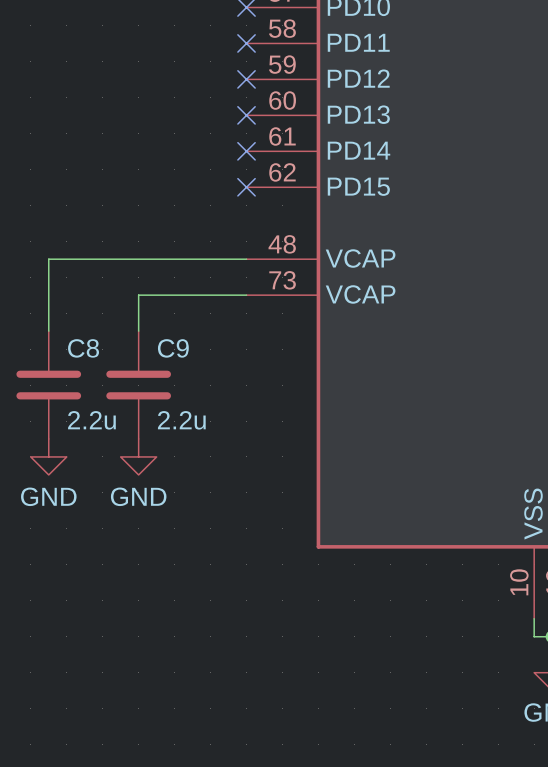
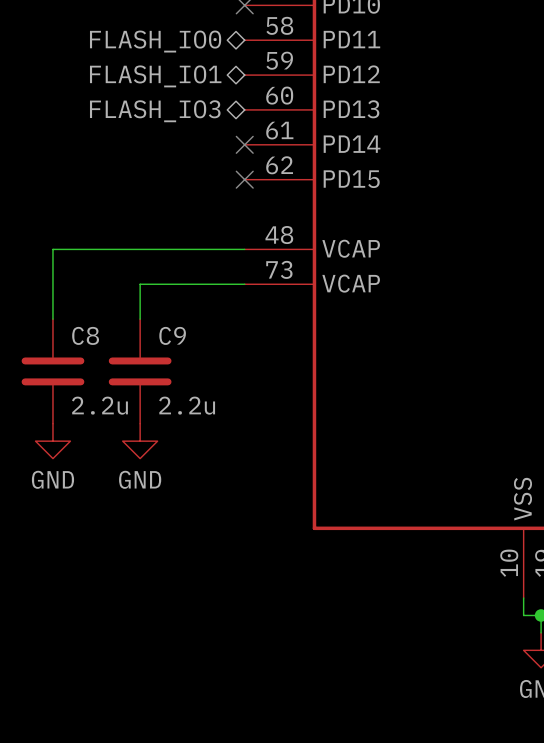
no-connect mark: (246, 43) -> none
hierarchical label: none -> FLASH_IO0 (155, 41)
no-connect mark: (246, 79) -> none
hierarchical label: none -> FLASH_IO1 (155, 76)
no-connect mark: (246, 115) -> none
hierarchical label: none -> FLASH_IO3 (155, 111)

